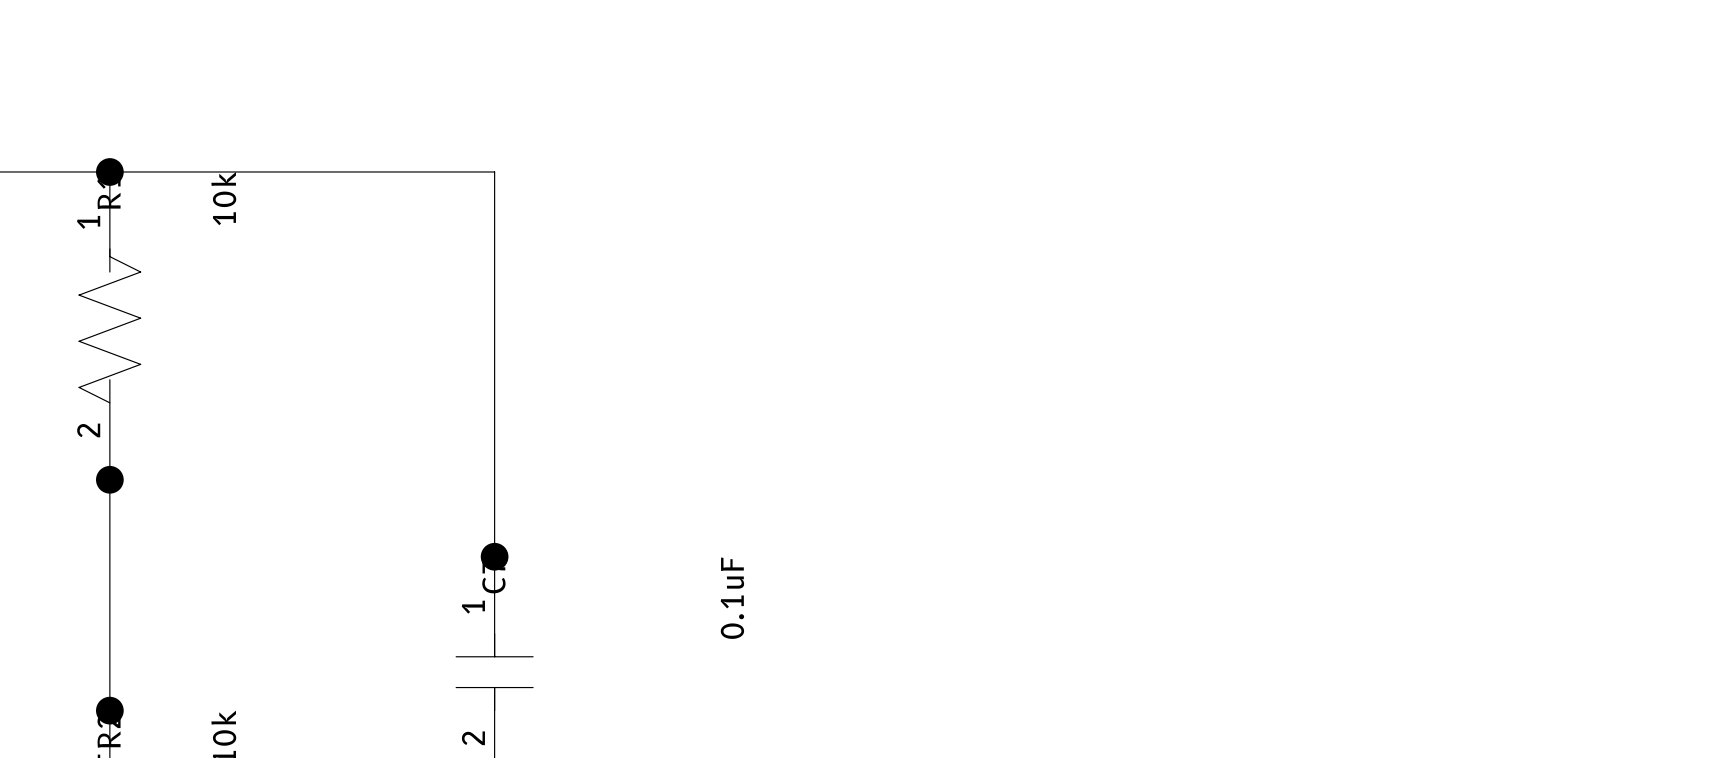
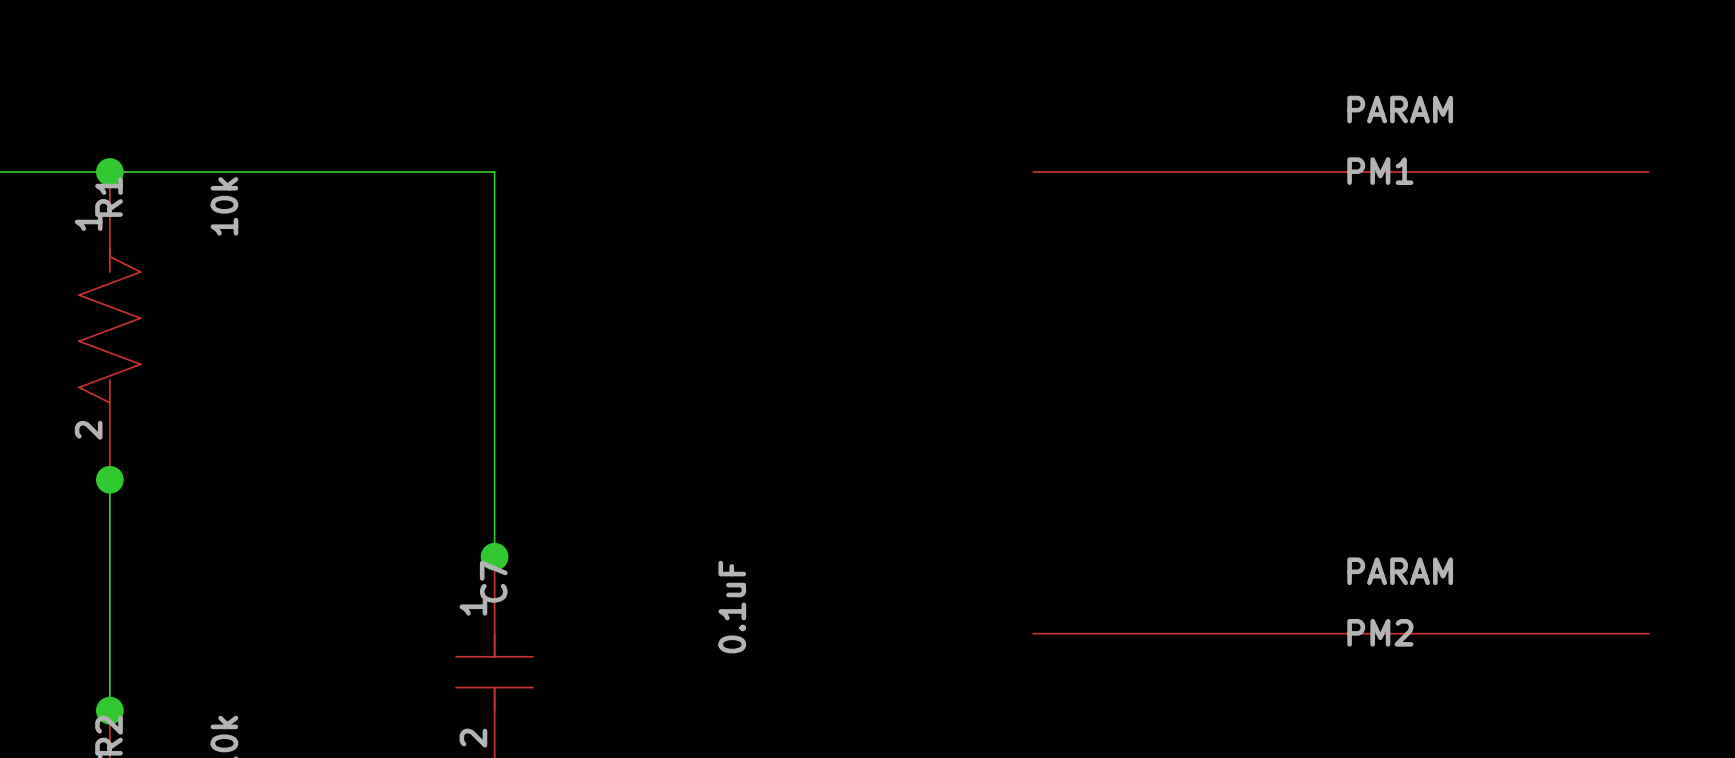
PM1: none -> PARAM (1341, 171)
PM2: none -> PARAM (1341, 633)

